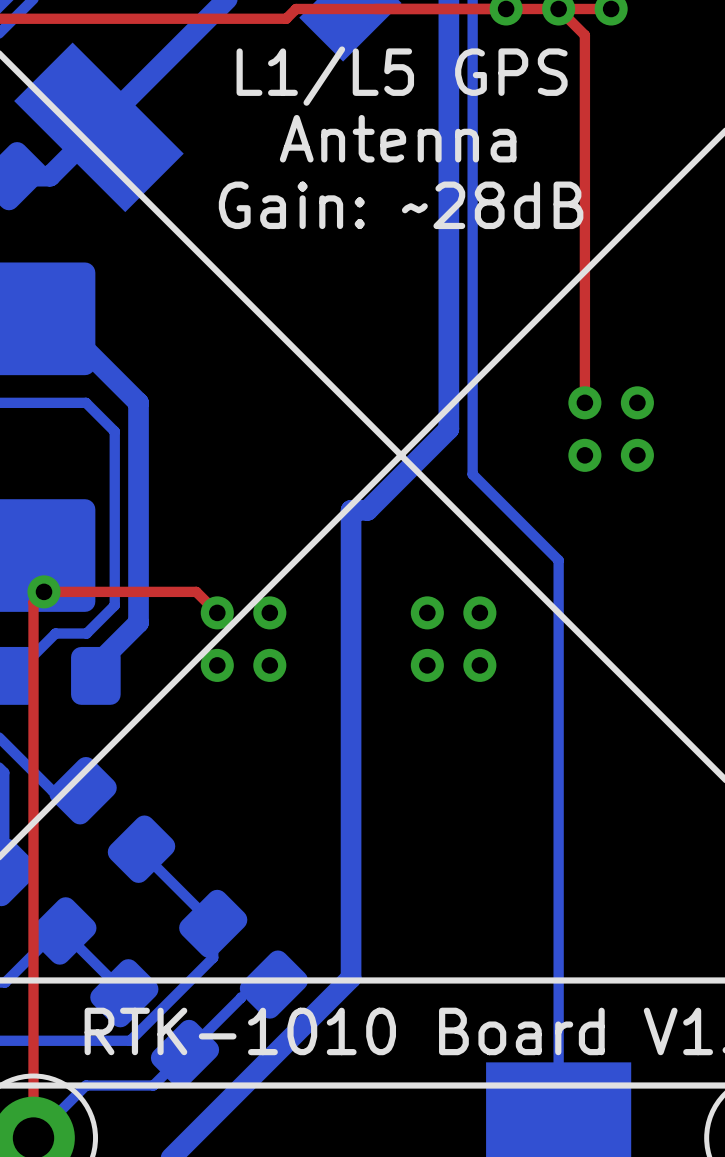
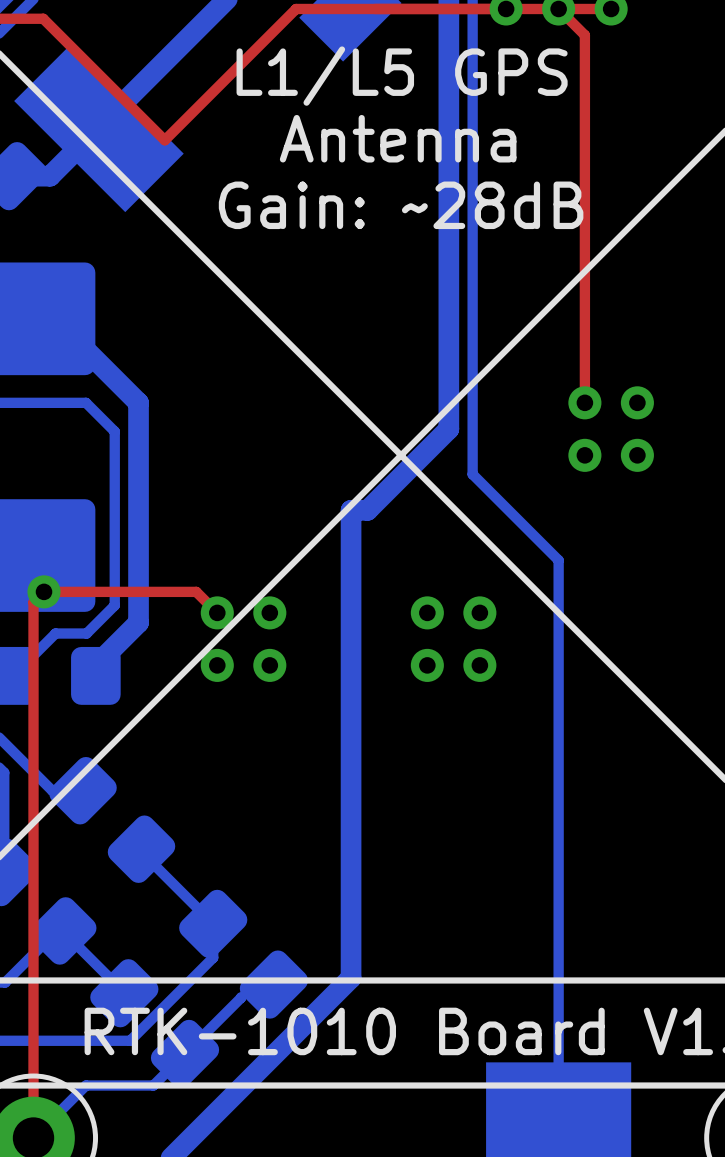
top track: (43, 18) (286, 18) -> (43, 18) (164, 140) (286, 18)

